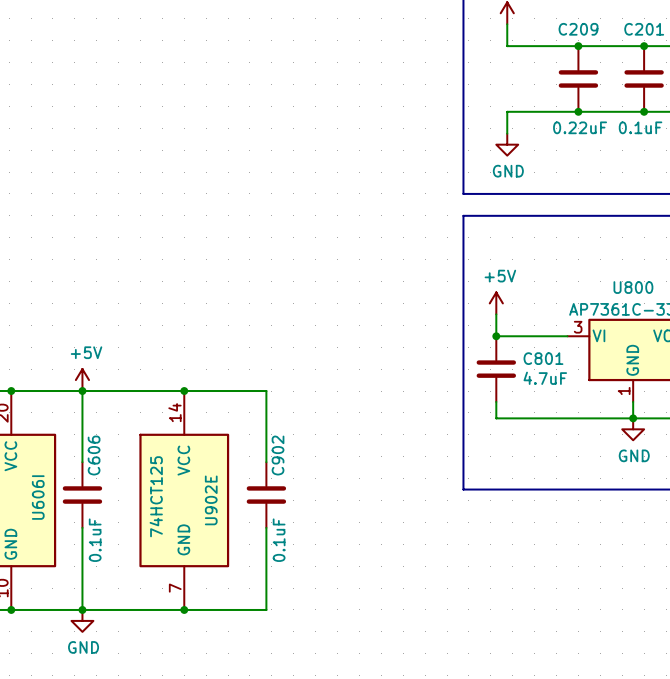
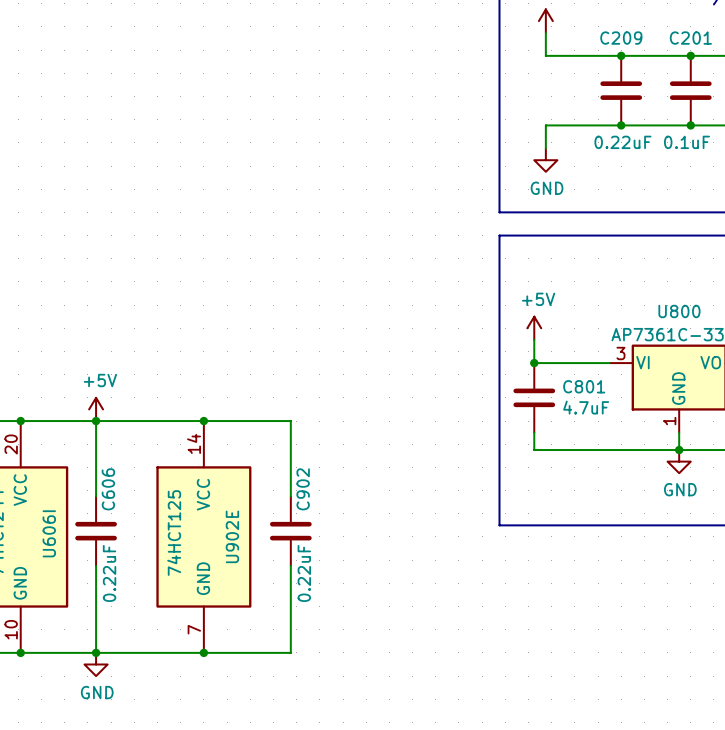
C606 value: 0.1uF (95, 540) -> 0.22uF (109, 573)
C902 value: 0.1uF (279, 540) -> 0.22uF (304, 573)

